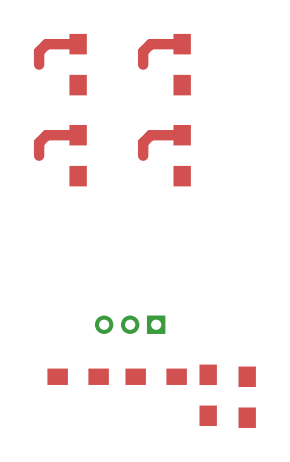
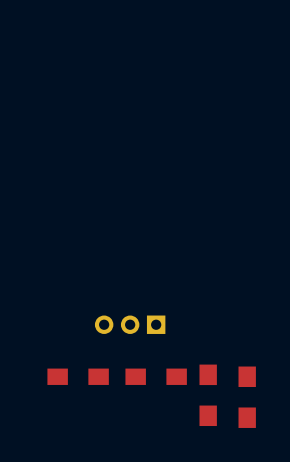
top track: (78, 44) (46, 44) (39, 51) (39, 64) -> none
top track: (182, 44) (150, 44) (143, 51) (143, 64) -> none
part: (78, 64) -> none
part: (182, 64) -> none
top track: (78, 135) (46, 135) (39, 142) (39, 155) -> none
top track: (182, 135) (150, 135) (143, 142) (143, 155) -> none
part: (78, 155) -> none
part: (182, 155) -> none

